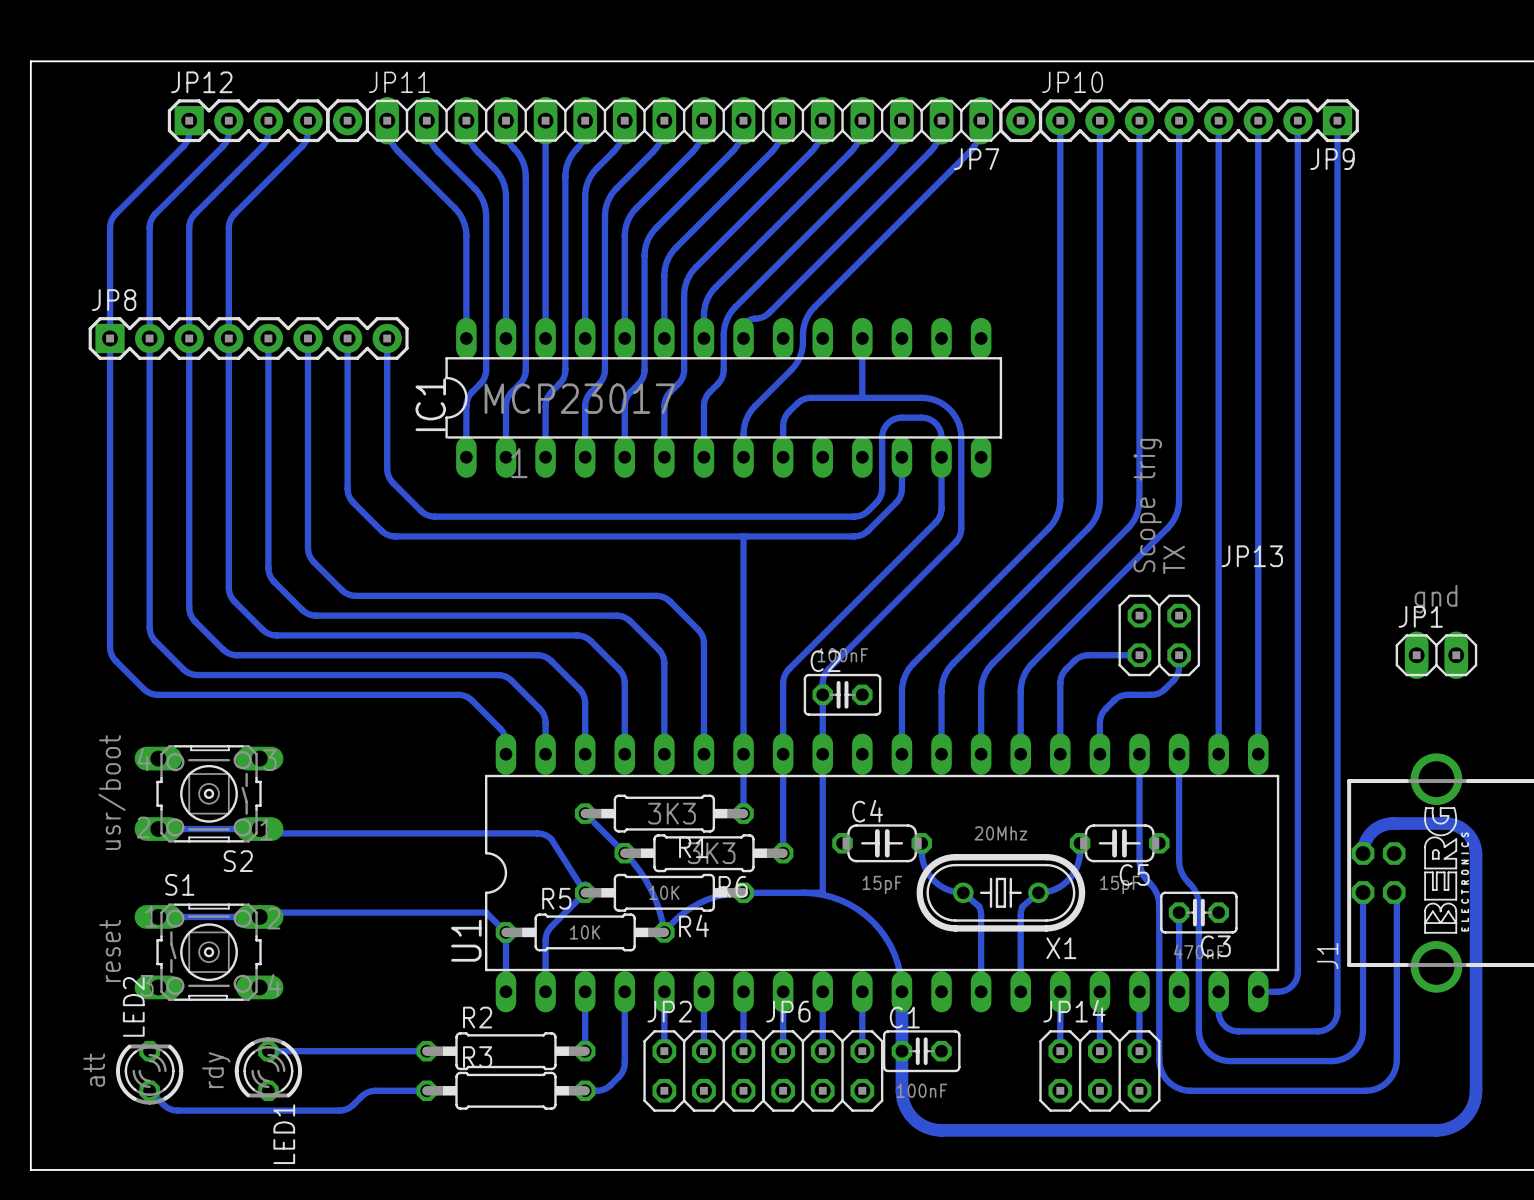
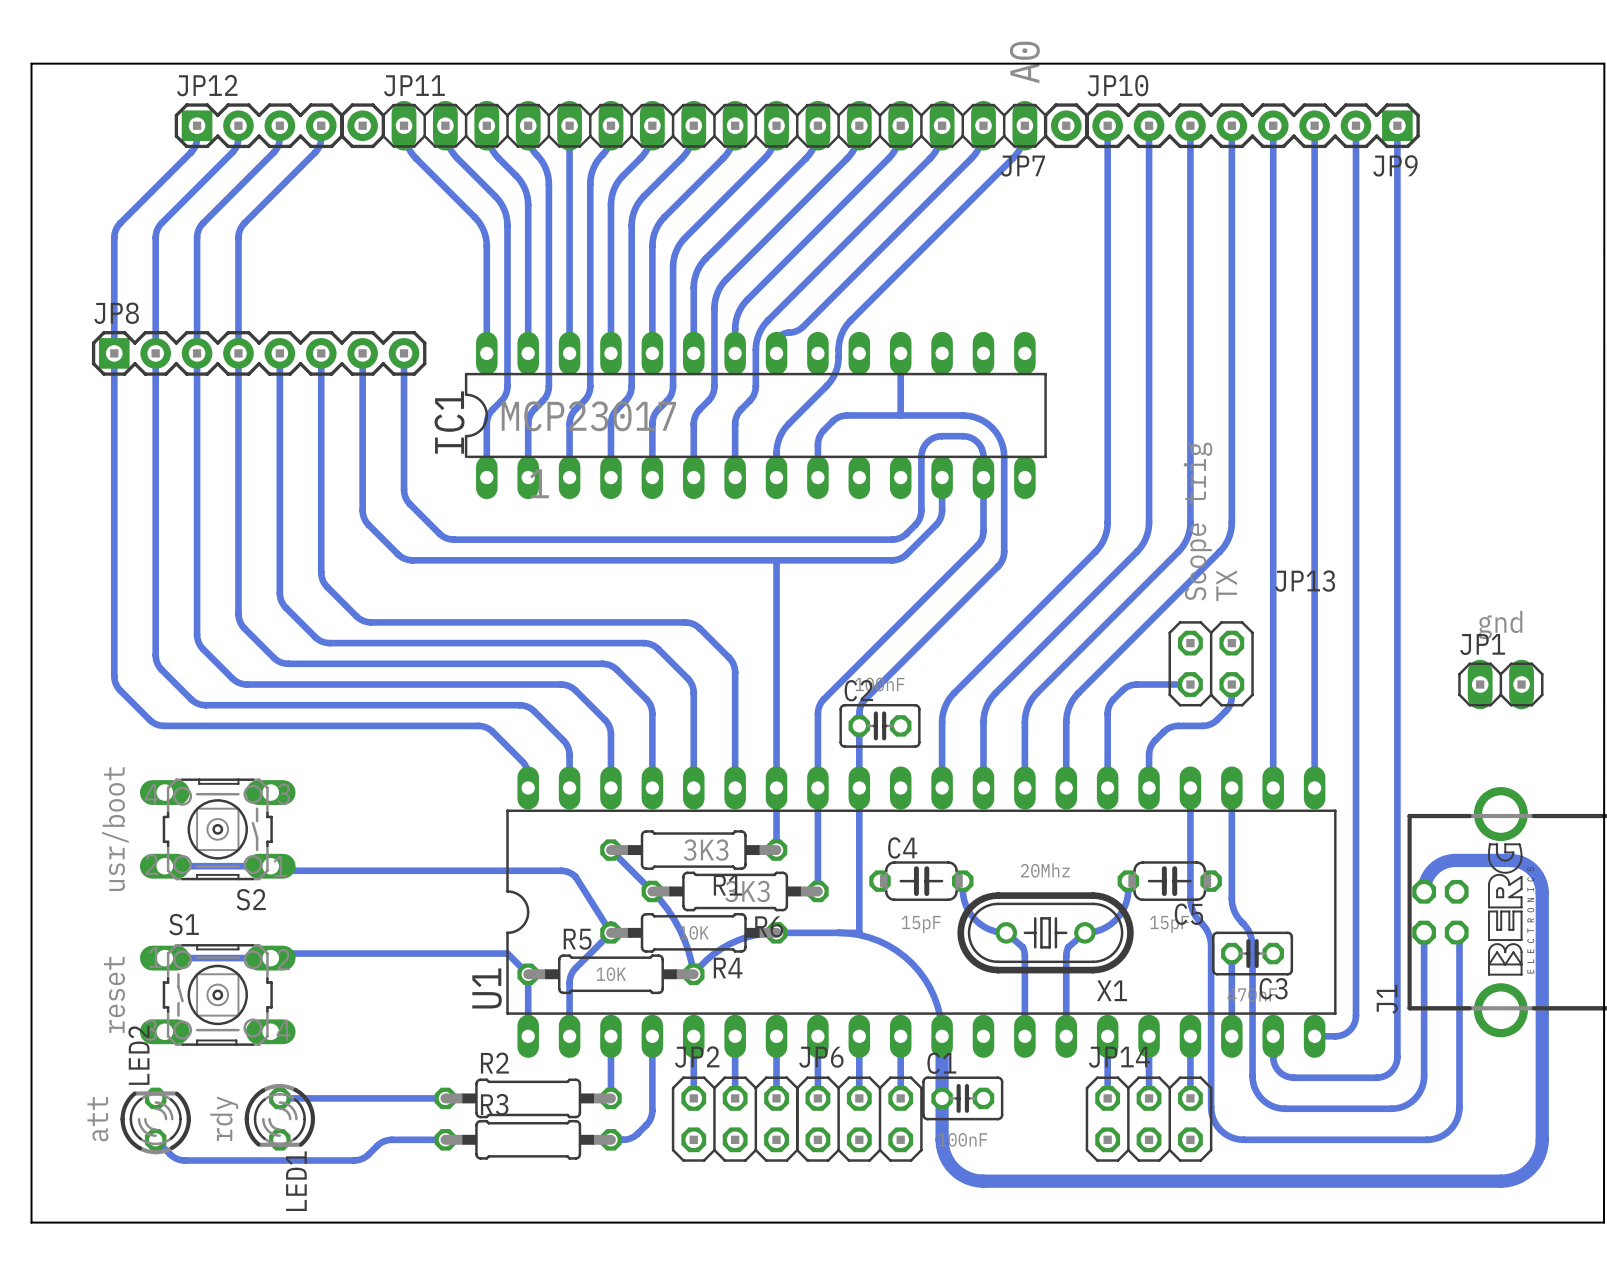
text: none -> A0 (1024, 62)

